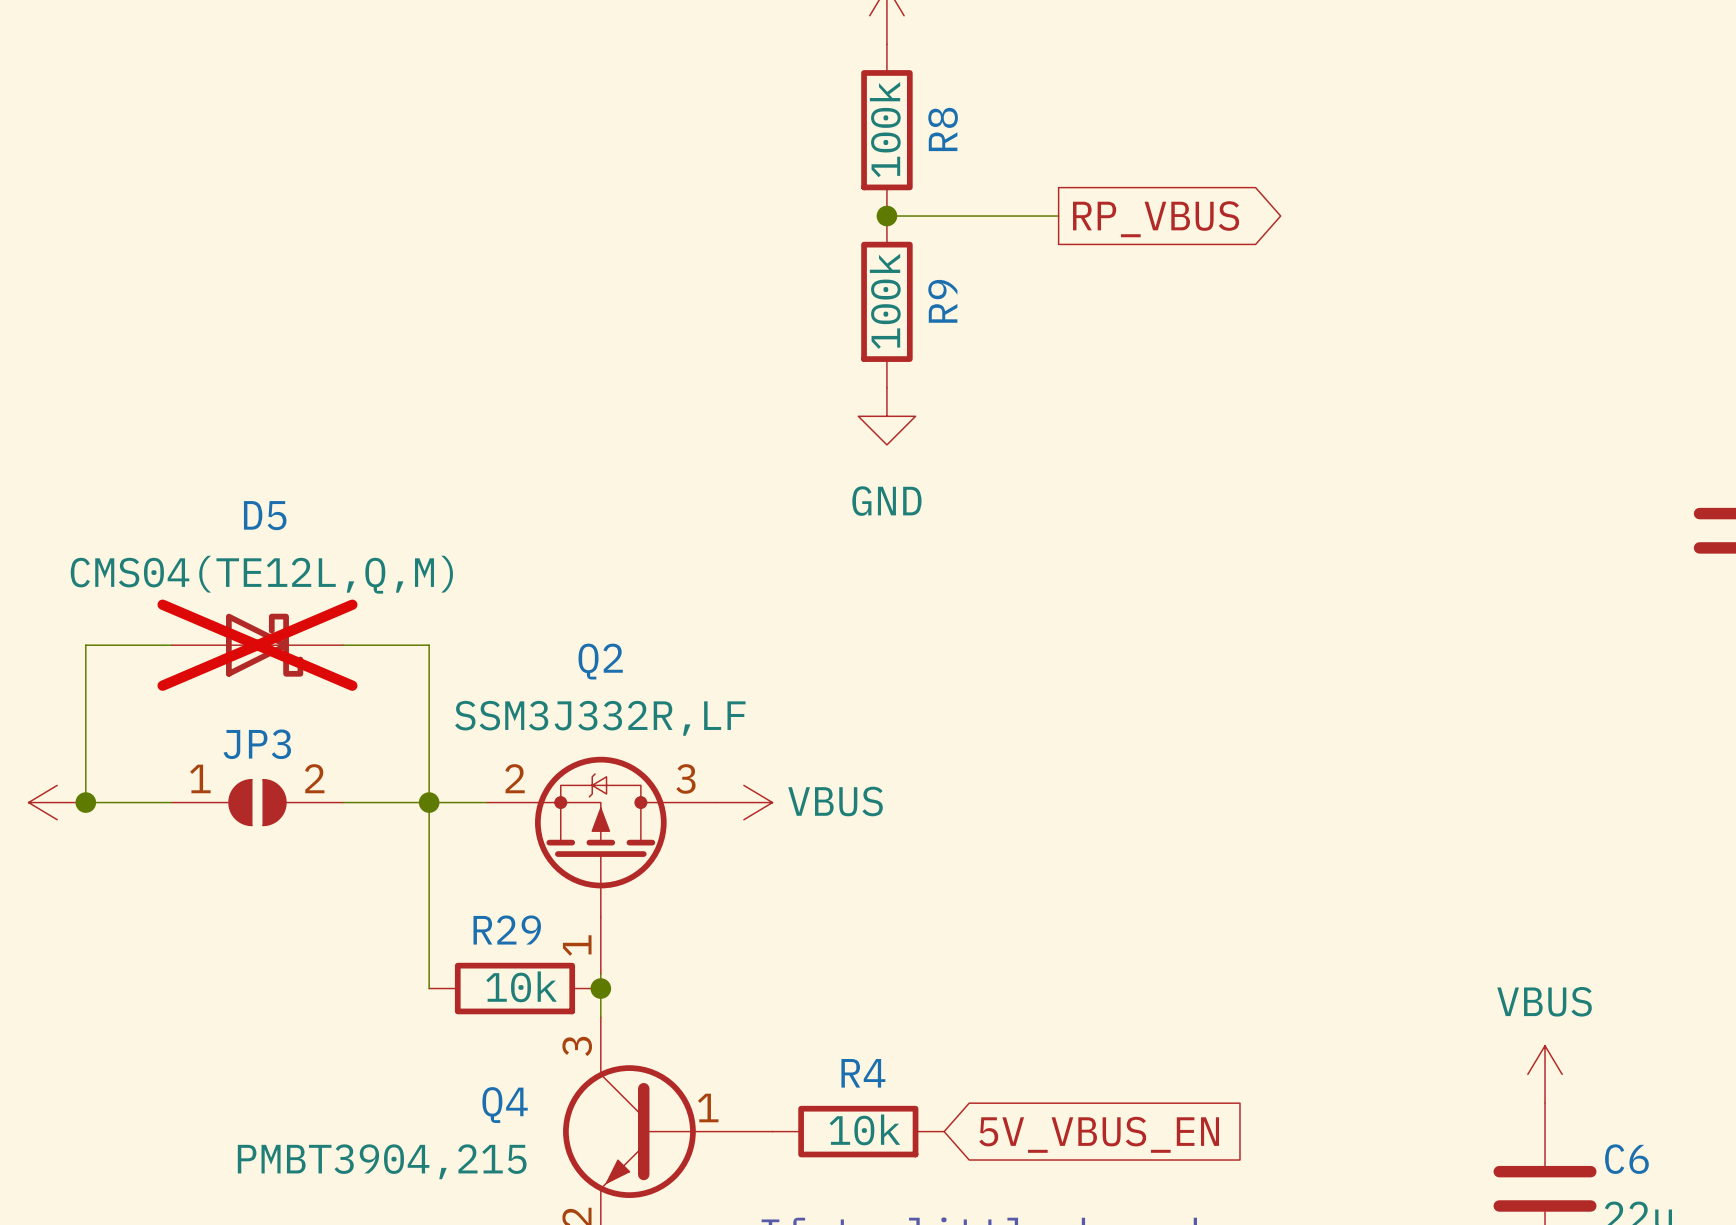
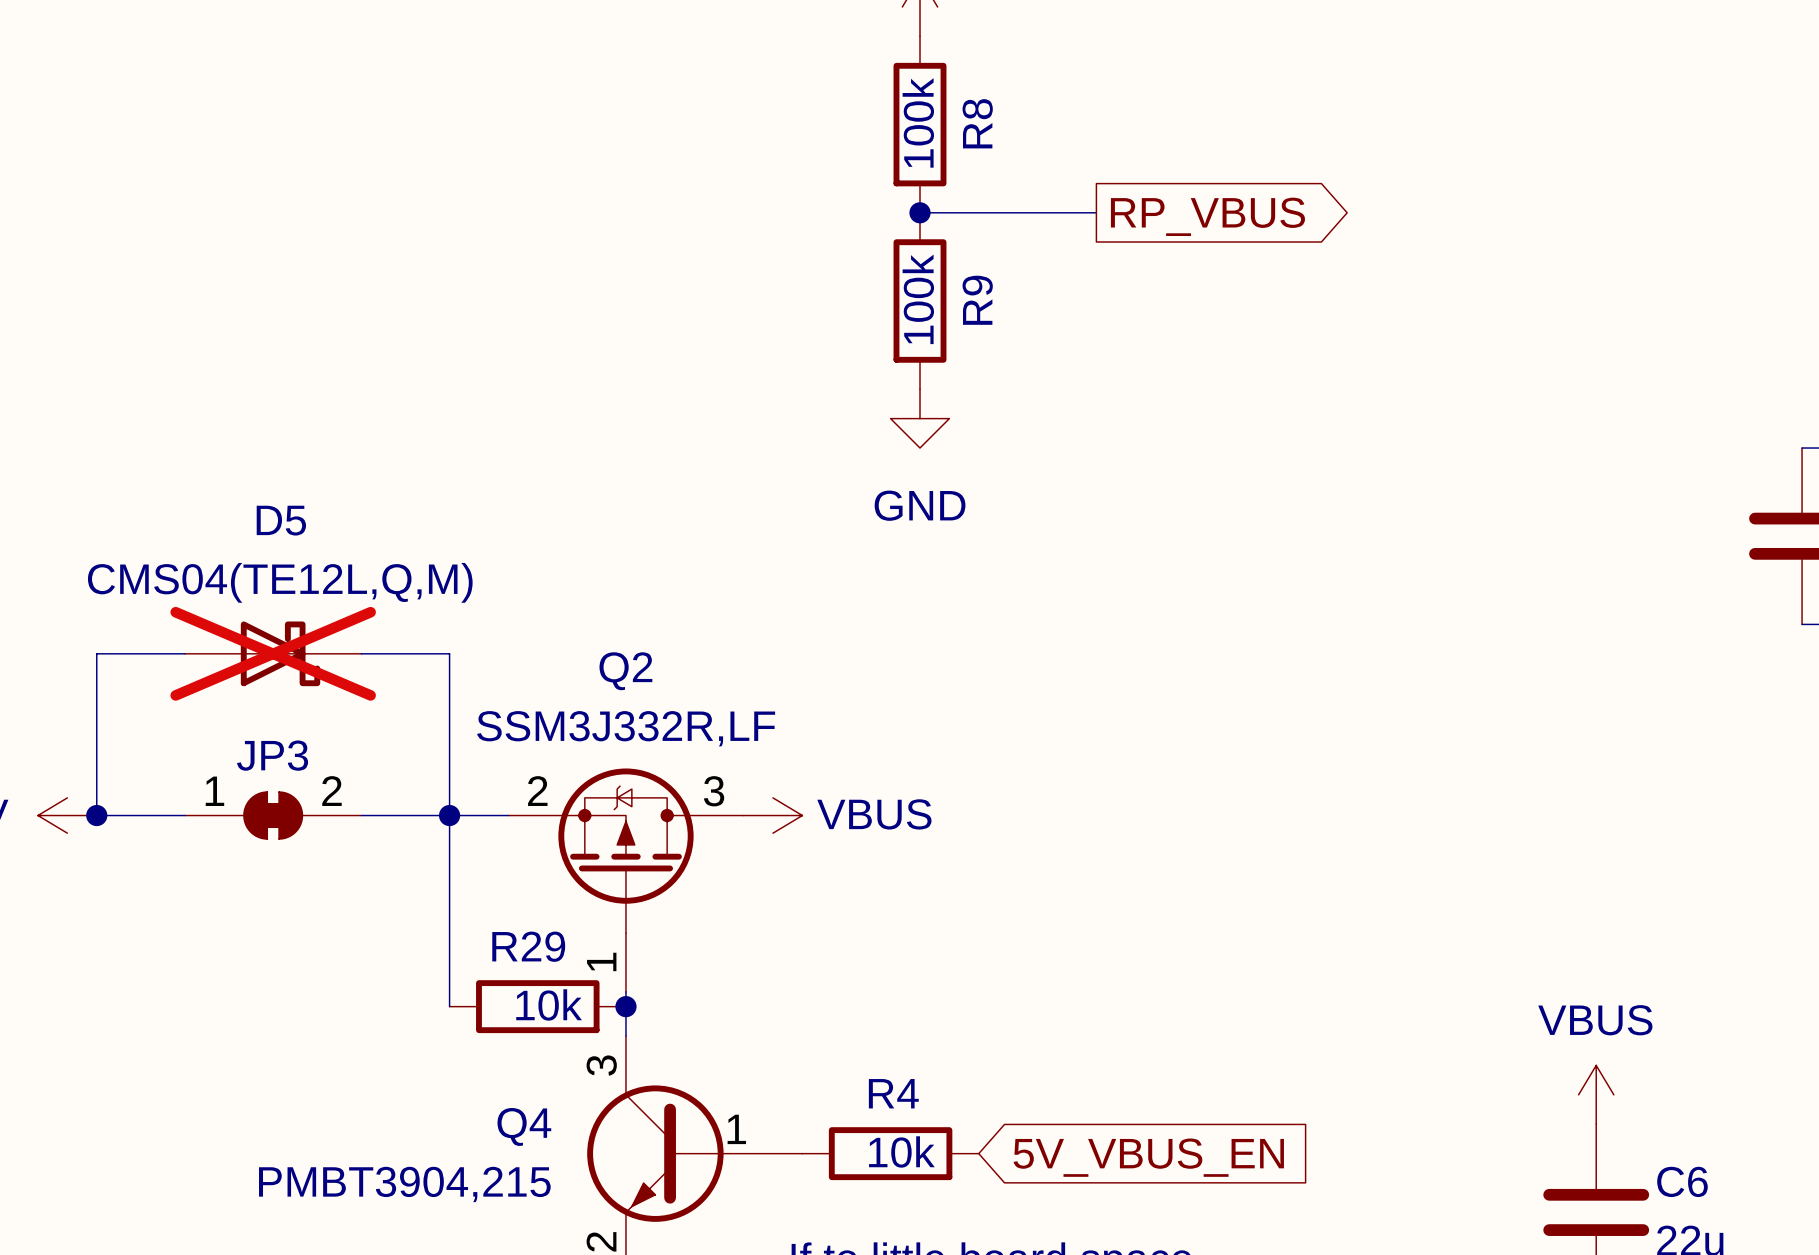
JP3 symbol: [171, 779, 344, 826] -> [184, 792, 362, 840]

